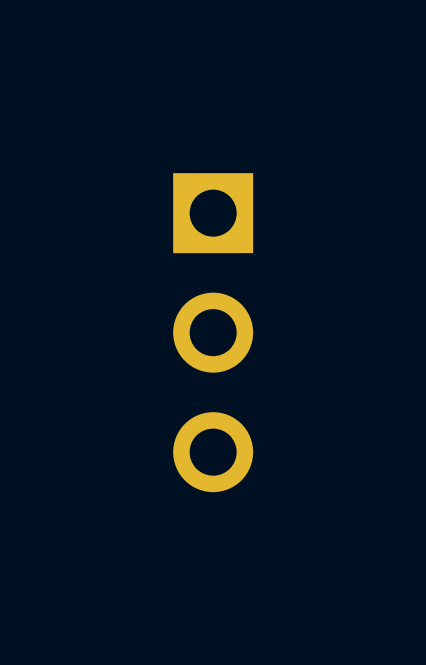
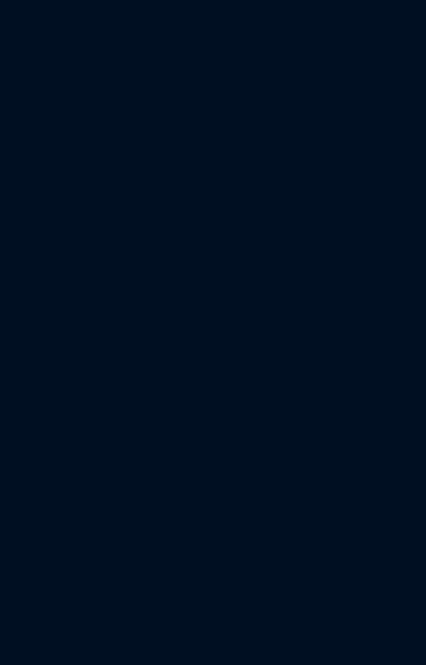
part: (213, 332) -> none

